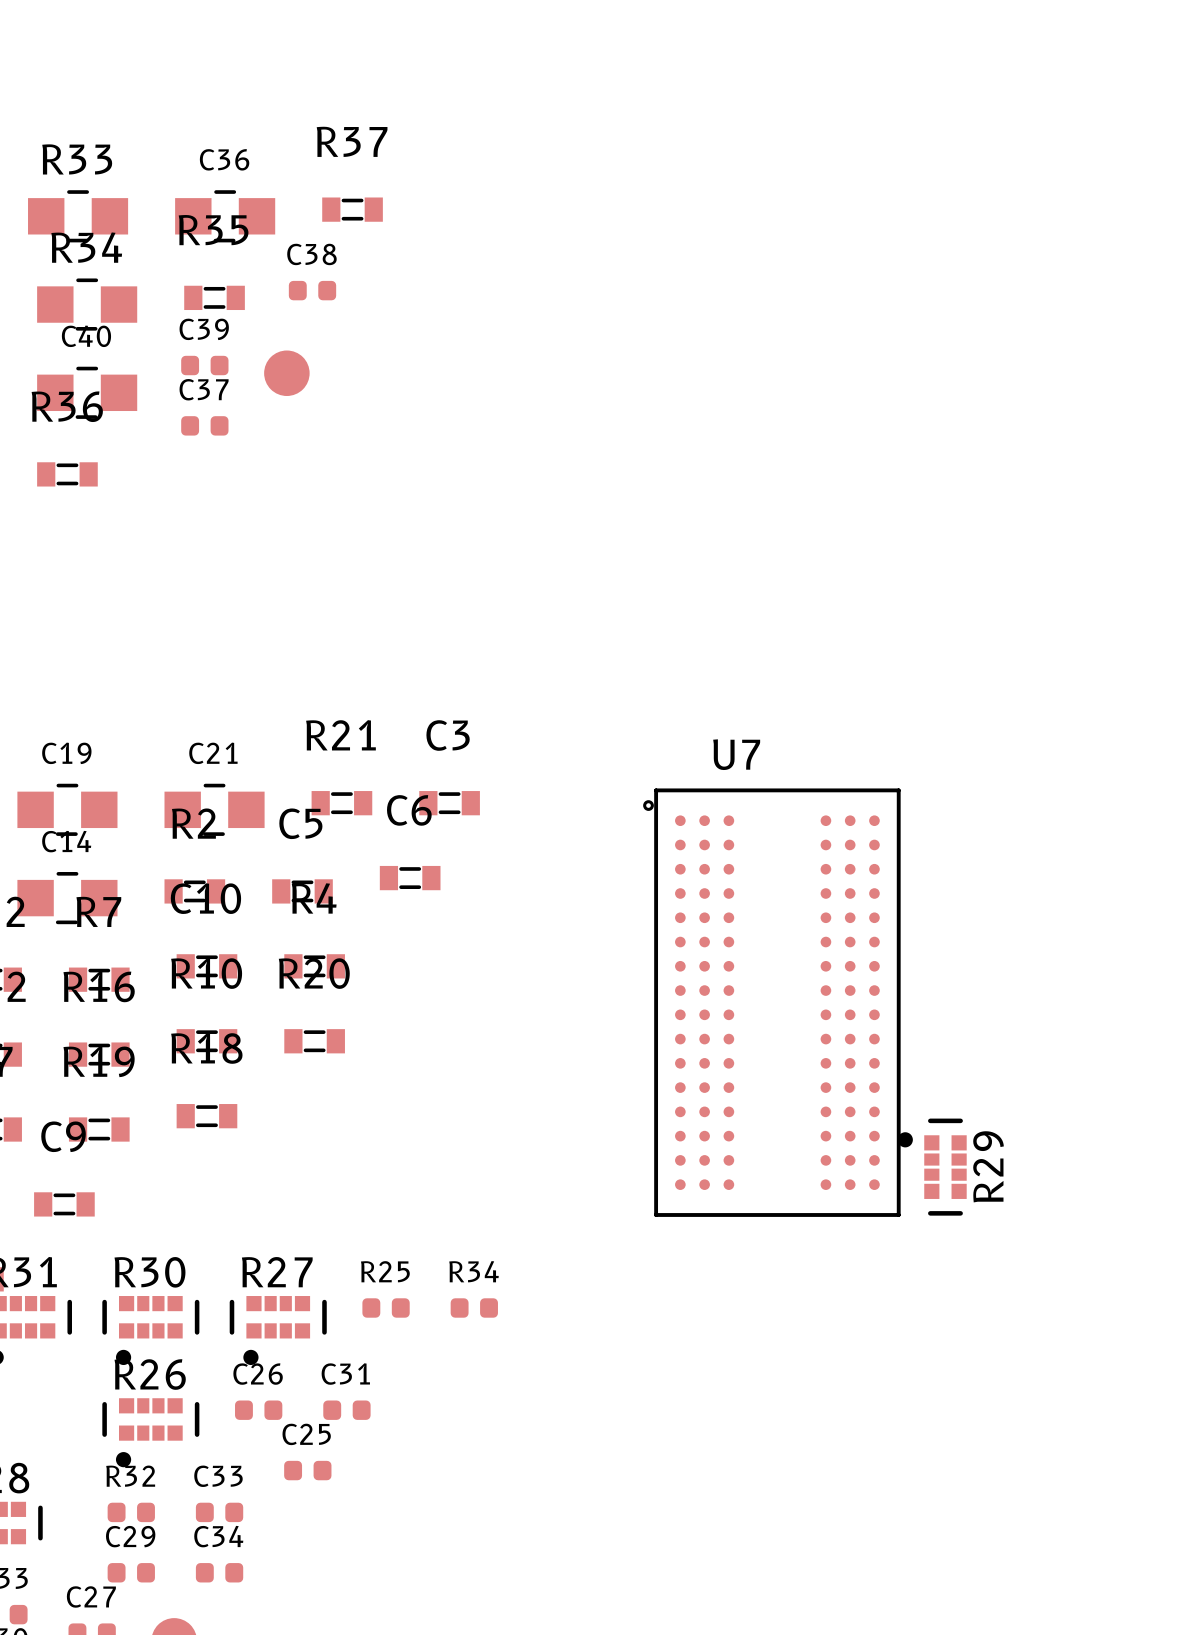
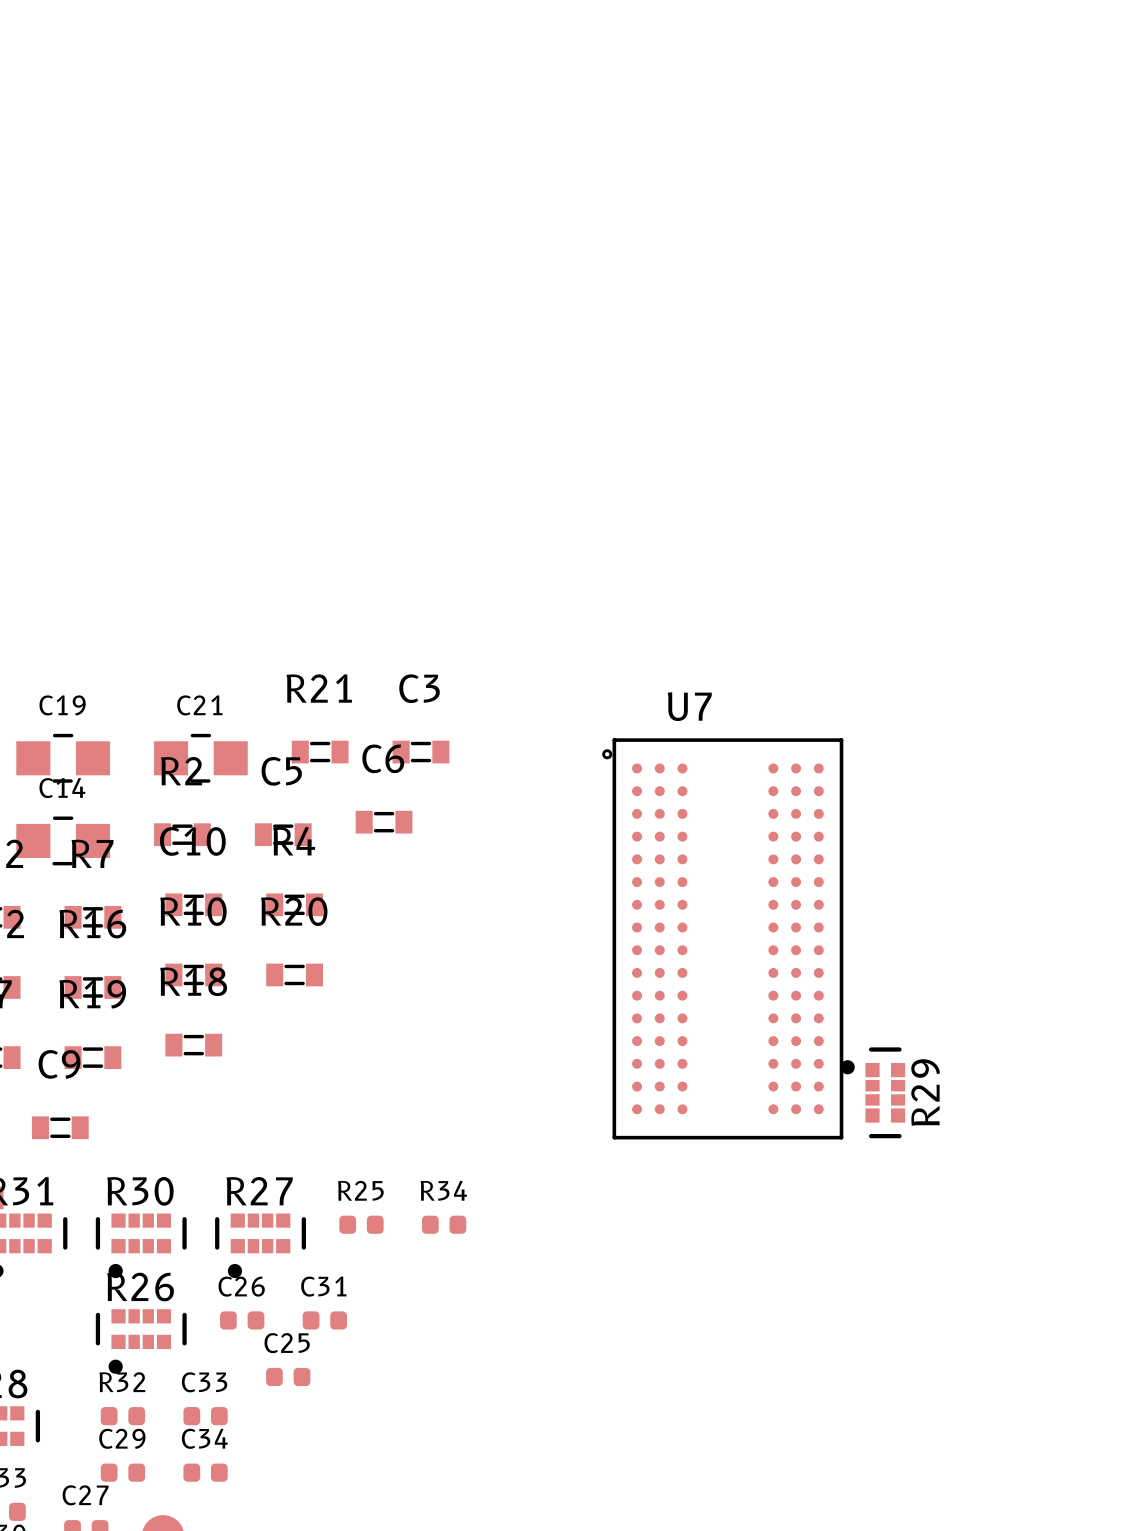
R37: (352, 209) -> none
R33: (78, 216) -> none
C36: (225, 216) -> none
C38: (312, 290) -> none
R35: (214, 297) -> none
R34: (87, 304) -> none
C39: (204, 365) -> none
part: (286, 373) -> none
C40: (87, 392) -> none
C37: (204, 425) -> none
R36: (67, 474) -> none

